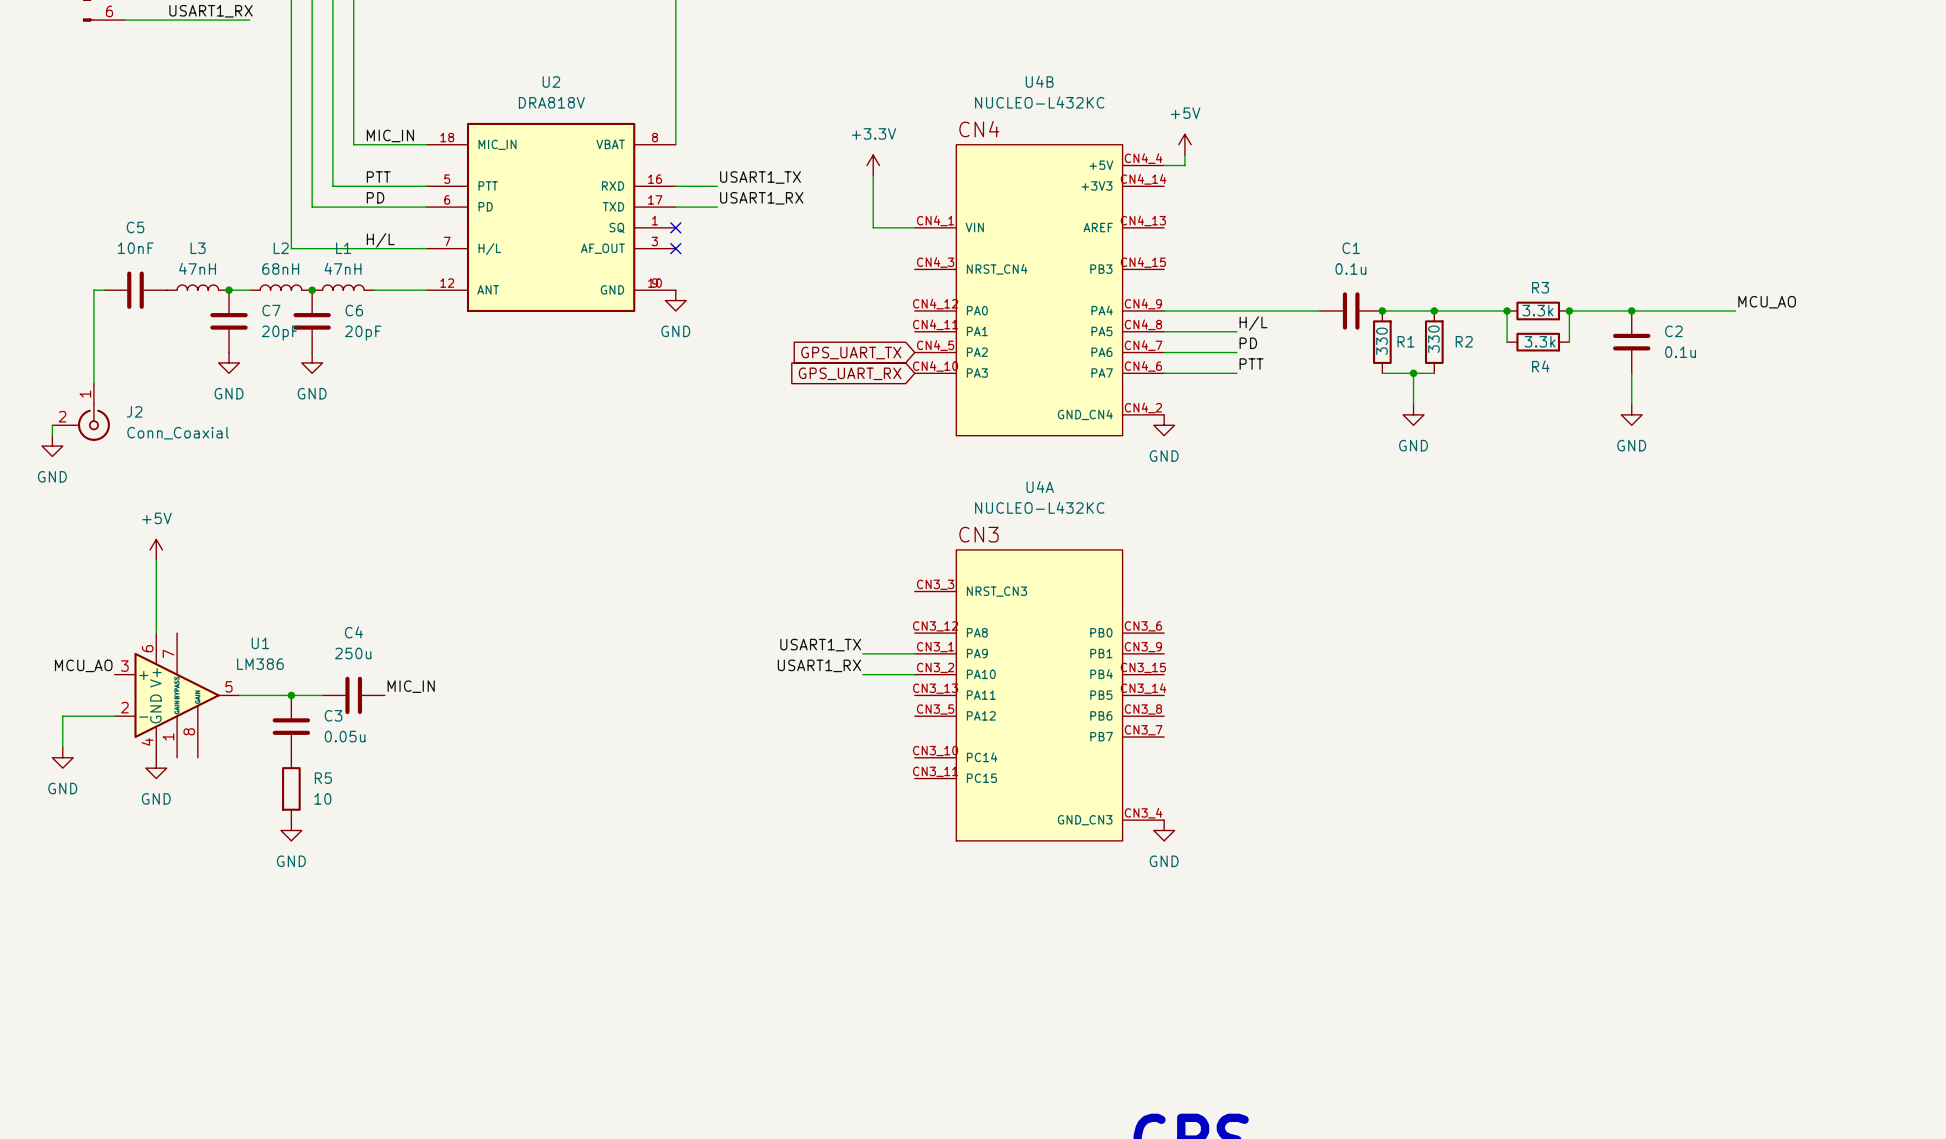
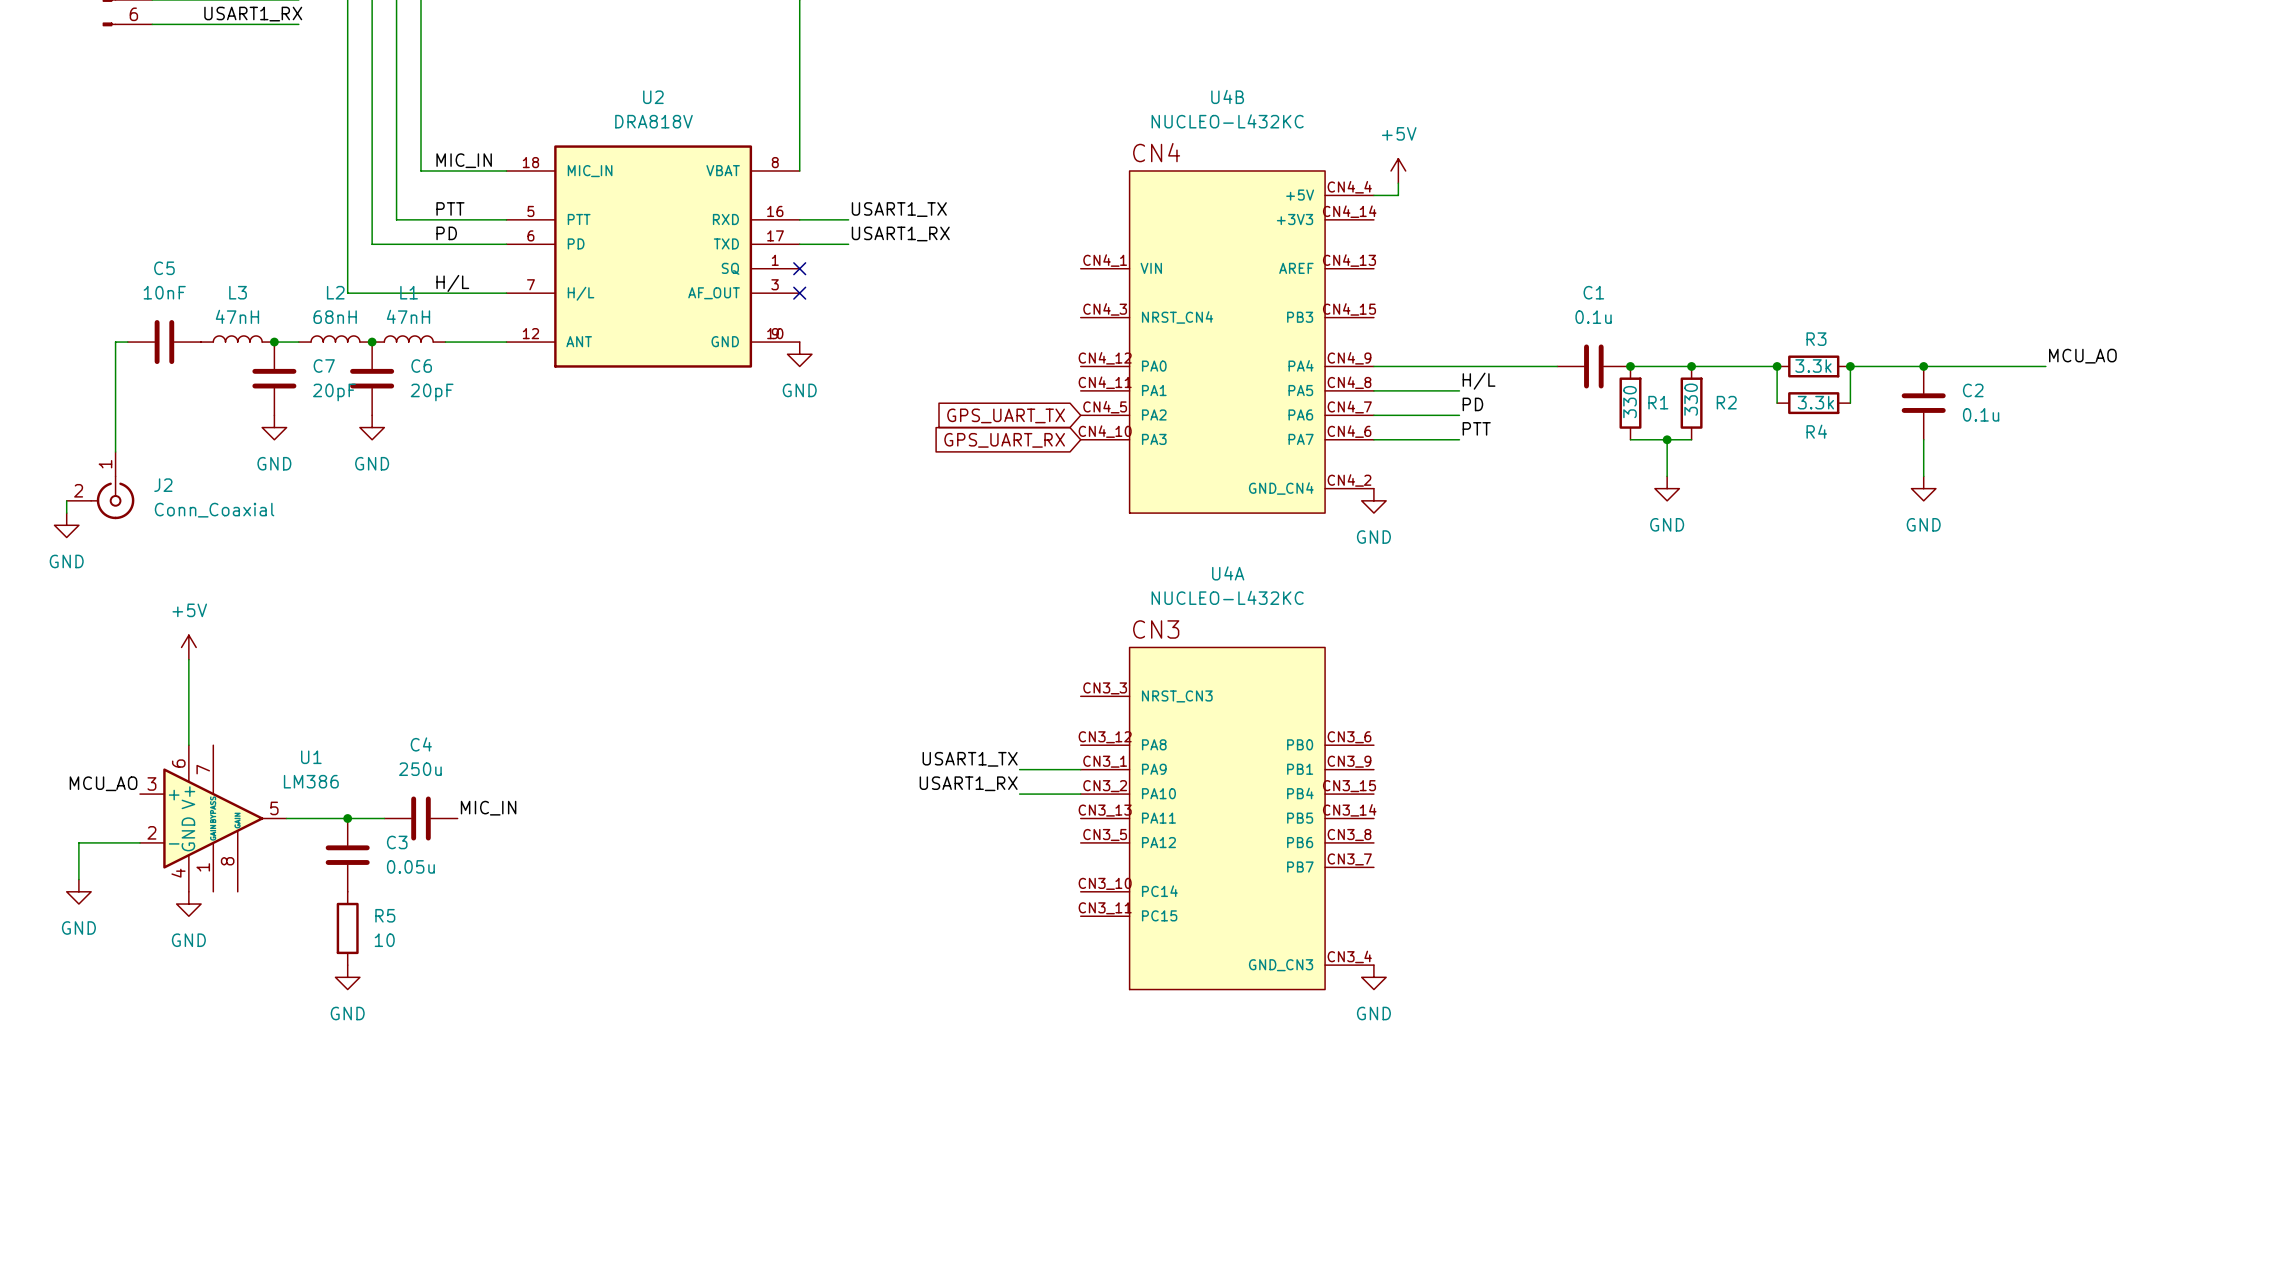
power symbol: +3.3V (873, 165) -> none
wire: (873, 175) (873, 227) (914, 227) -> none

